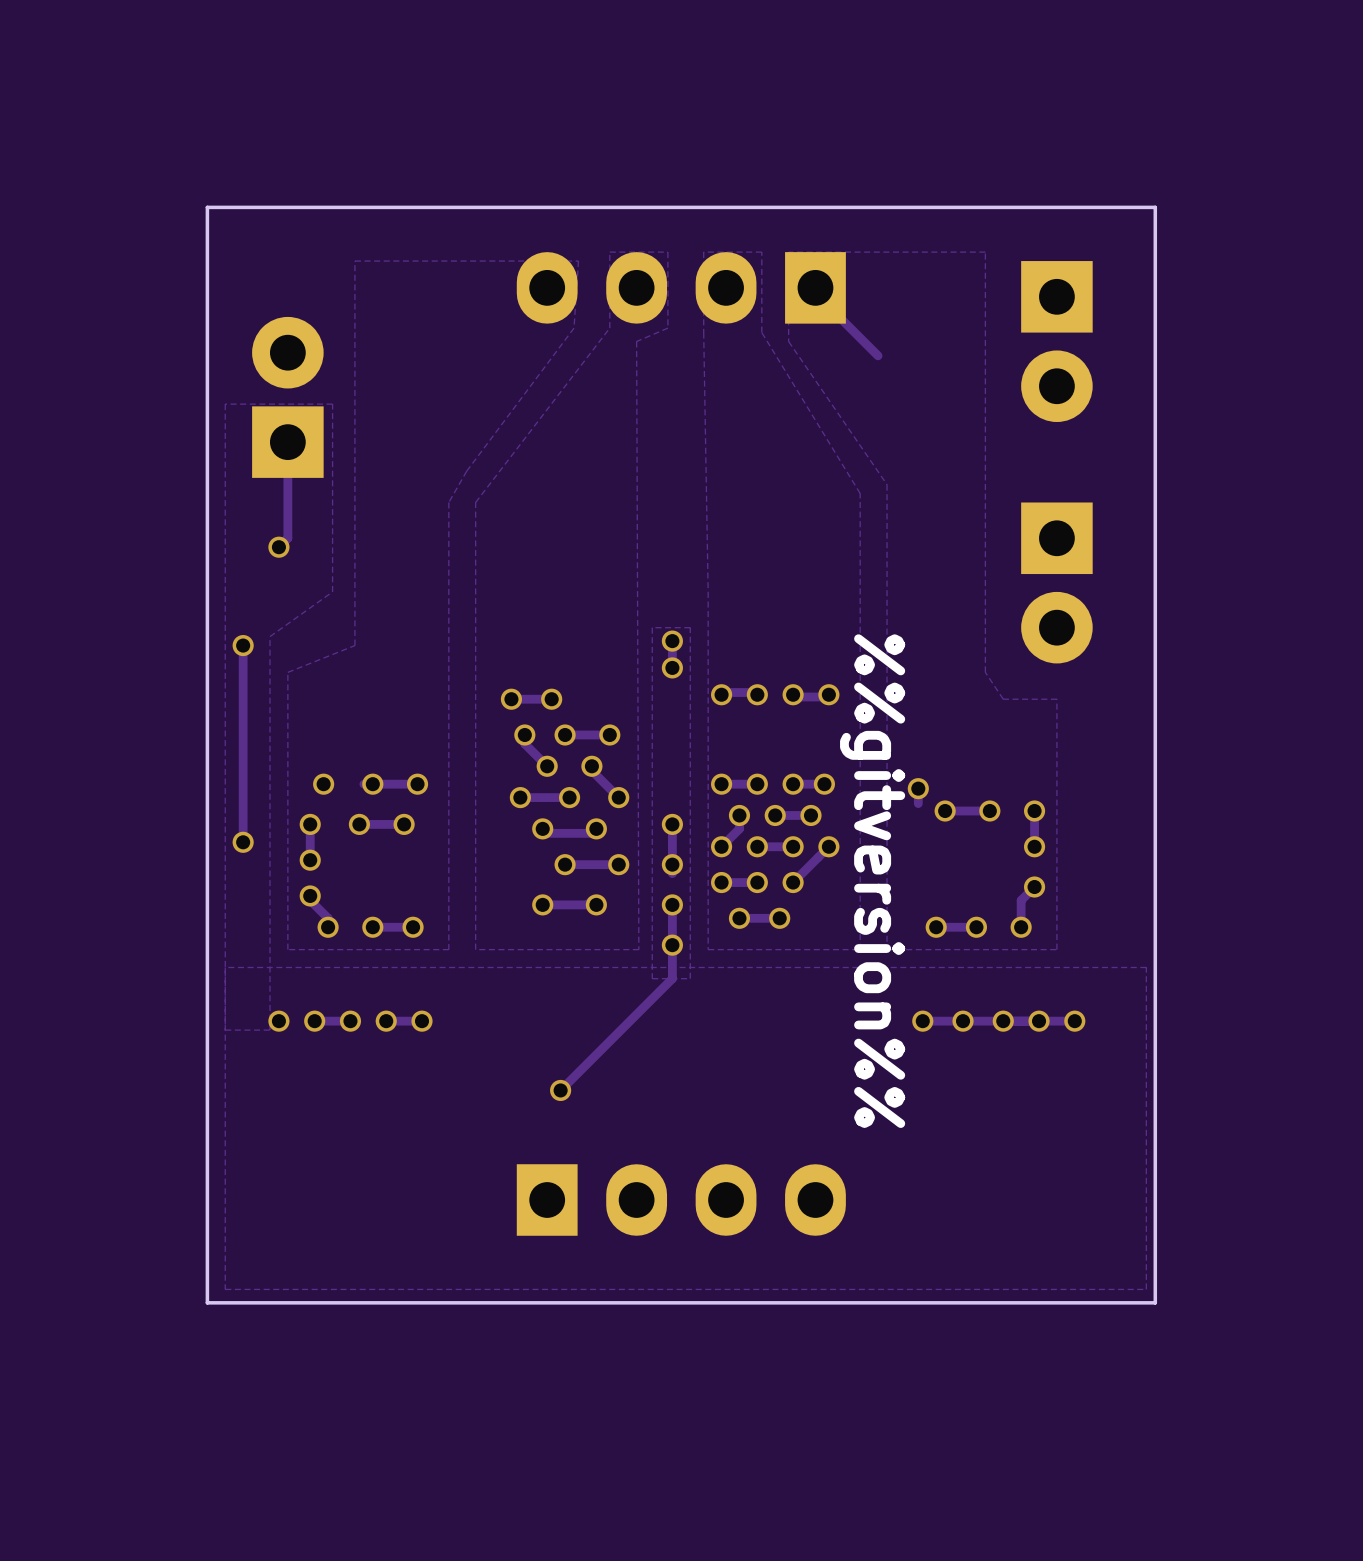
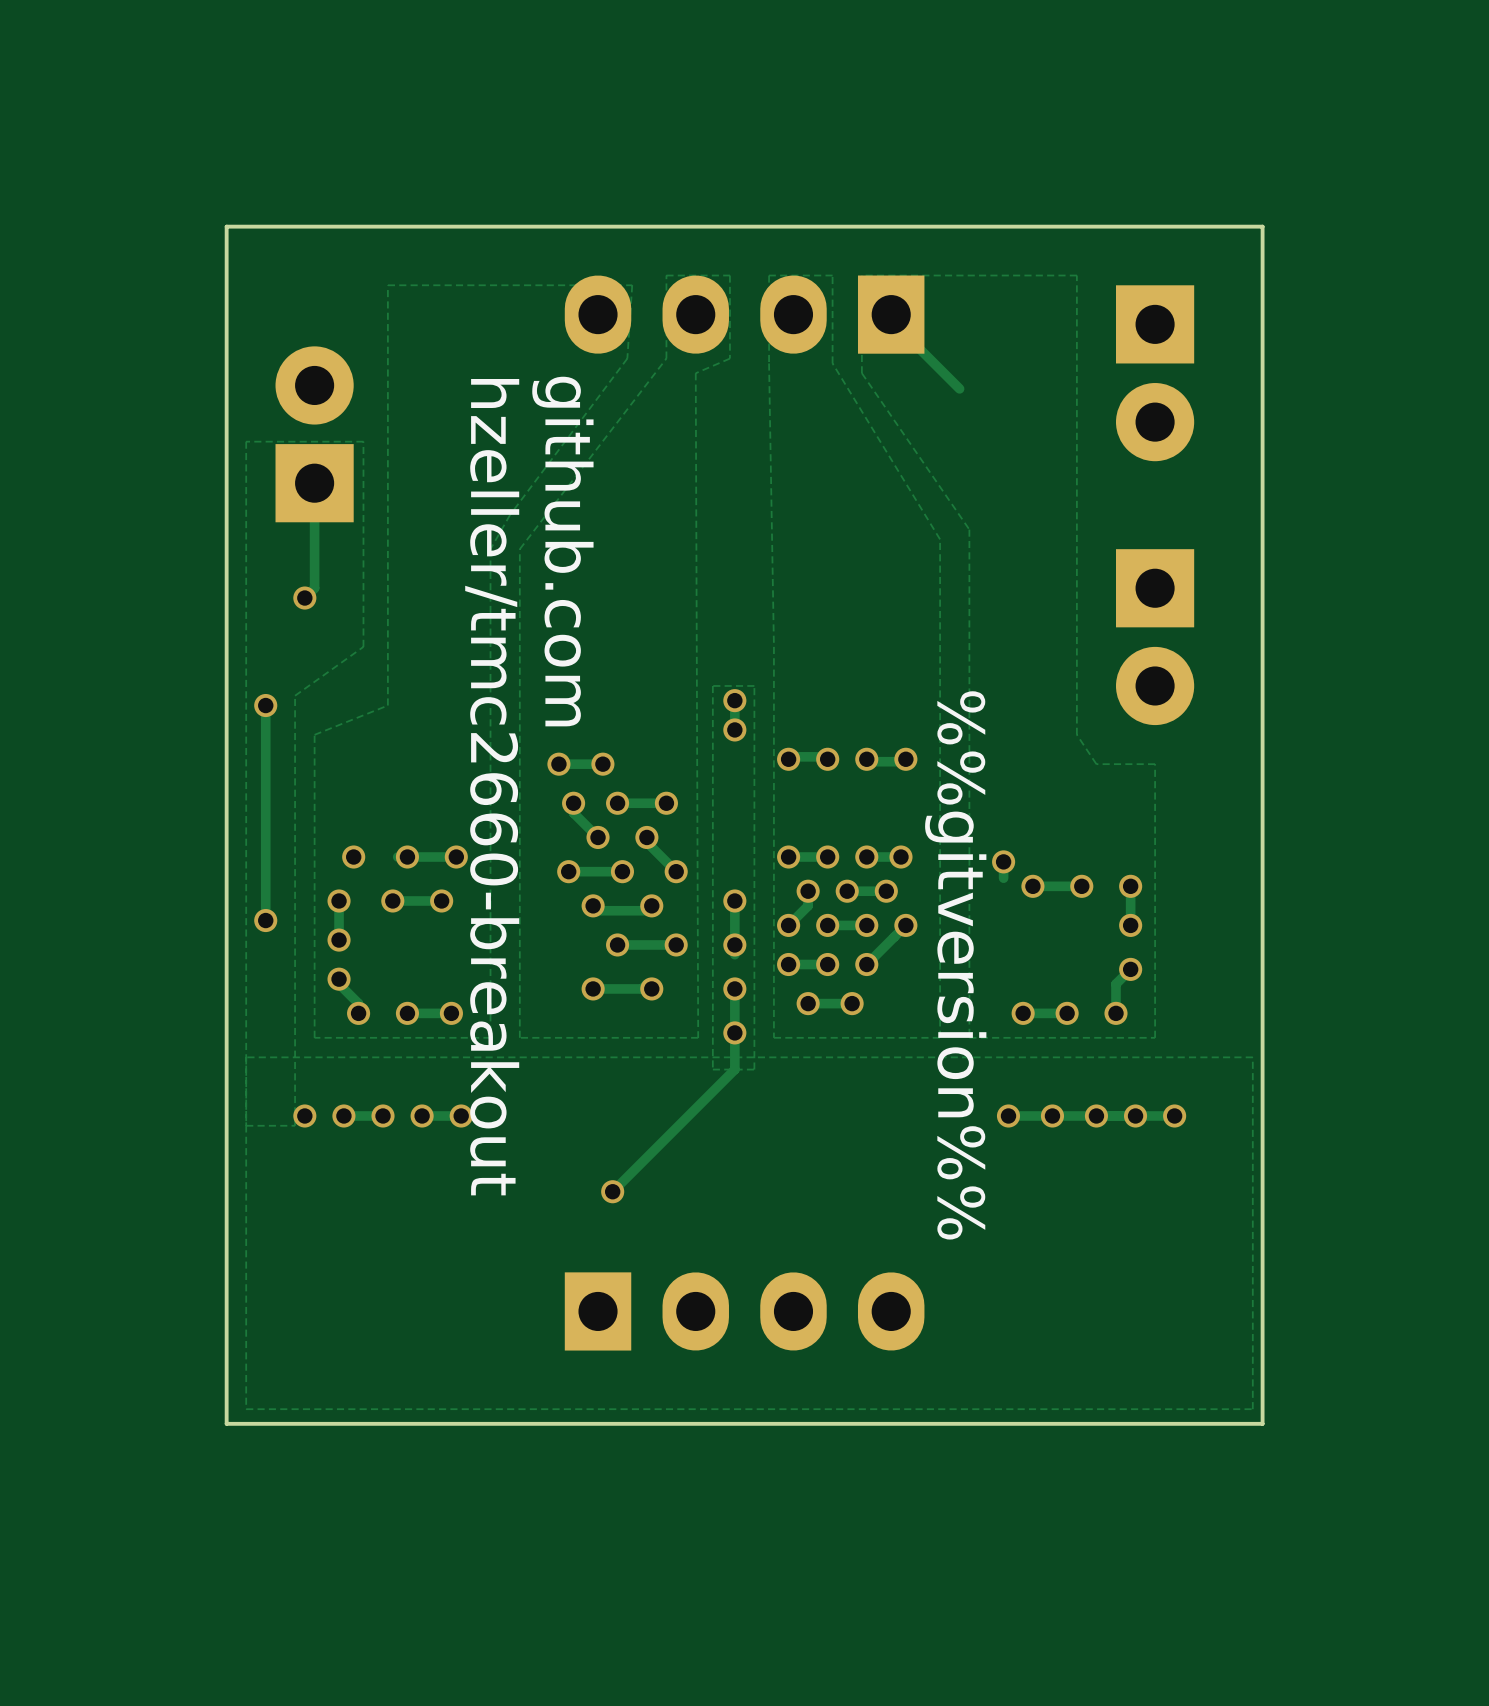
text: none -> github.com (562, 551)
text: none -> hzeller/tmc2660-breakout (492, 787)

